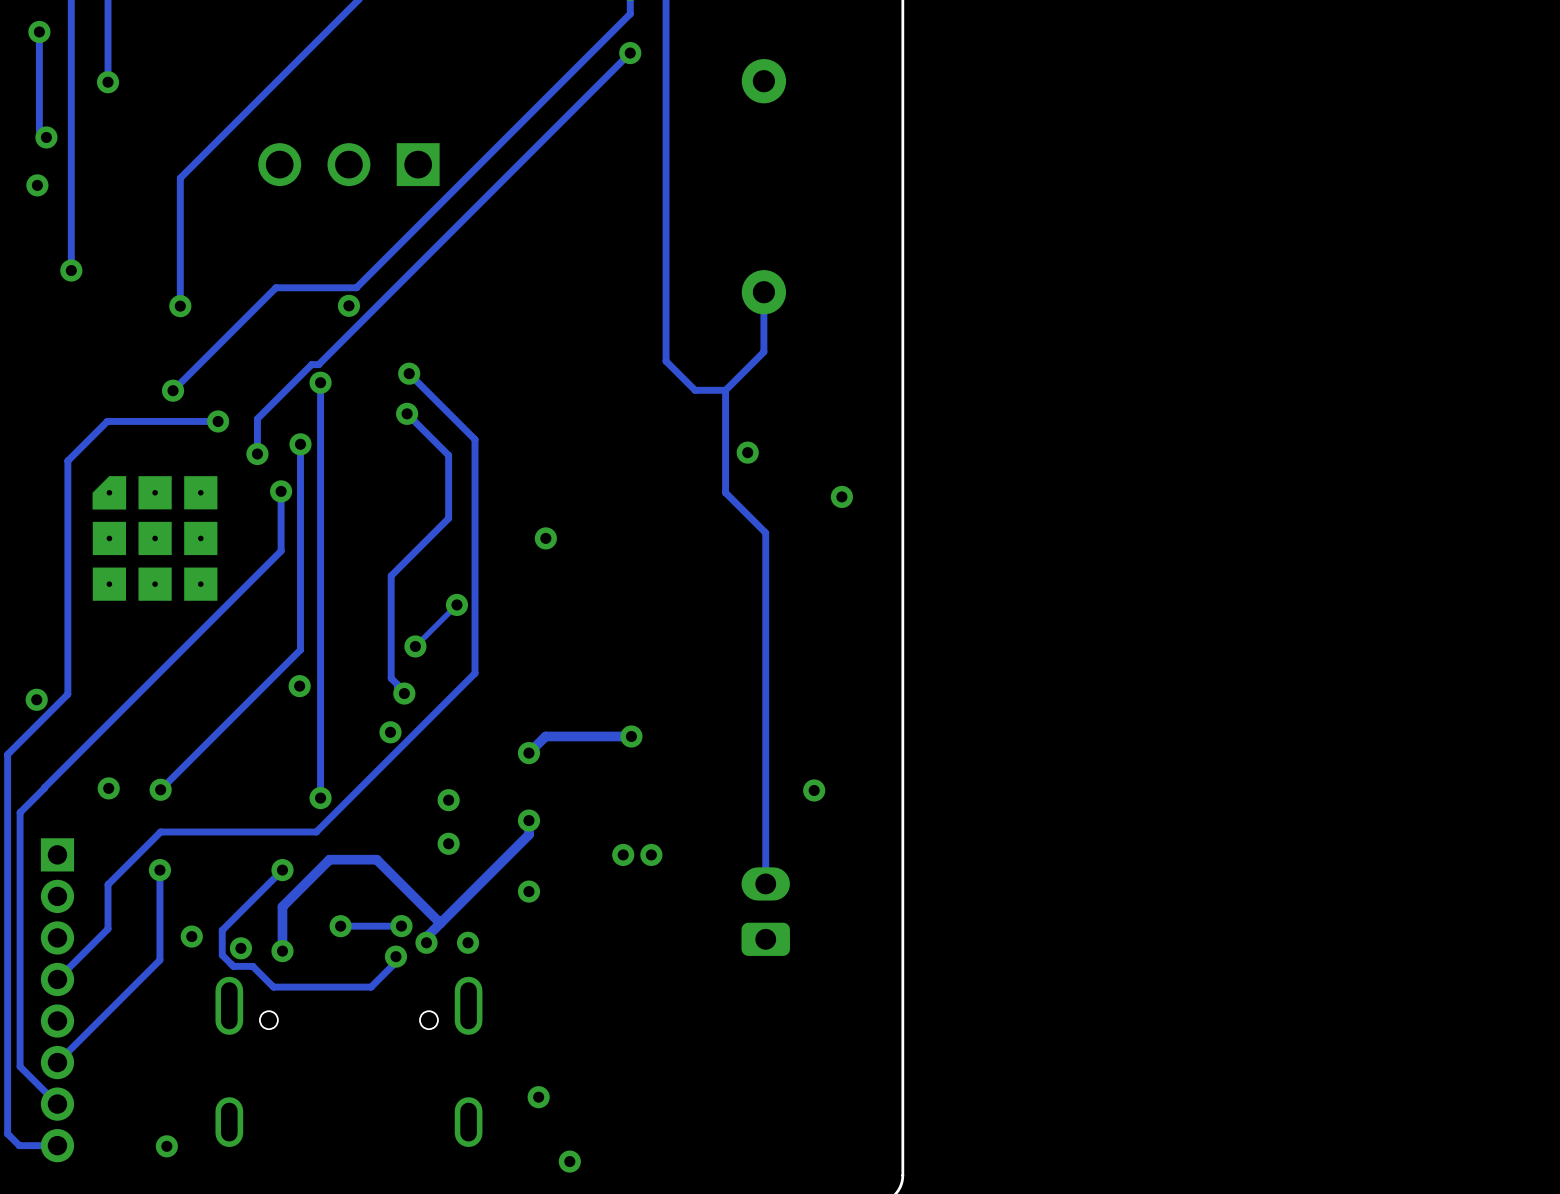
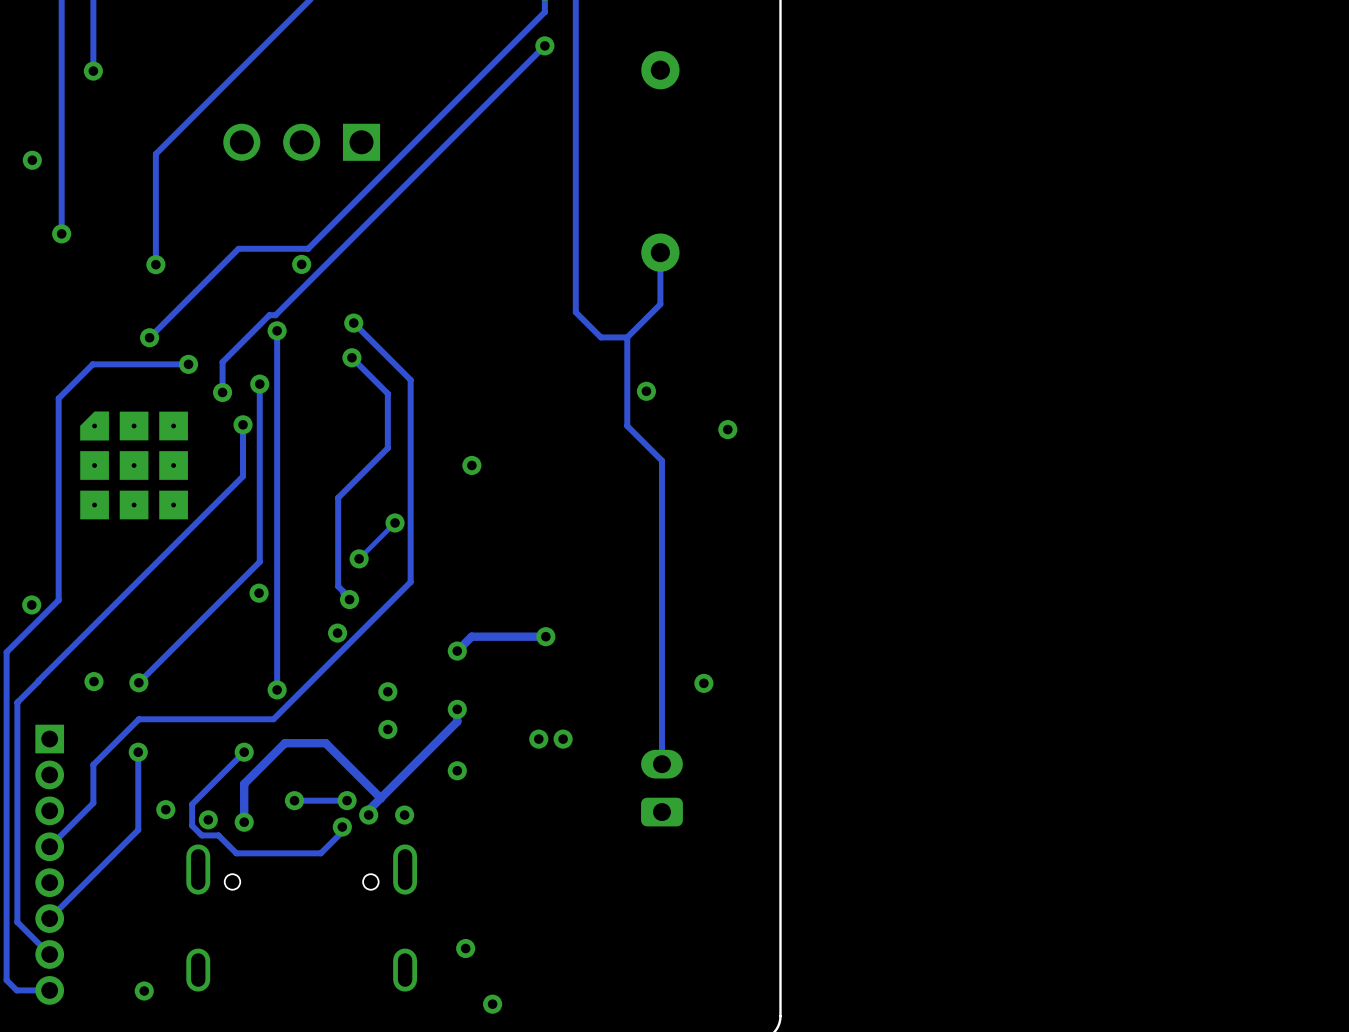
track: (39, 31) (39, 130) (46, 137) -> none
via: (39, 31) -> none
via: (46, 137) -> none

